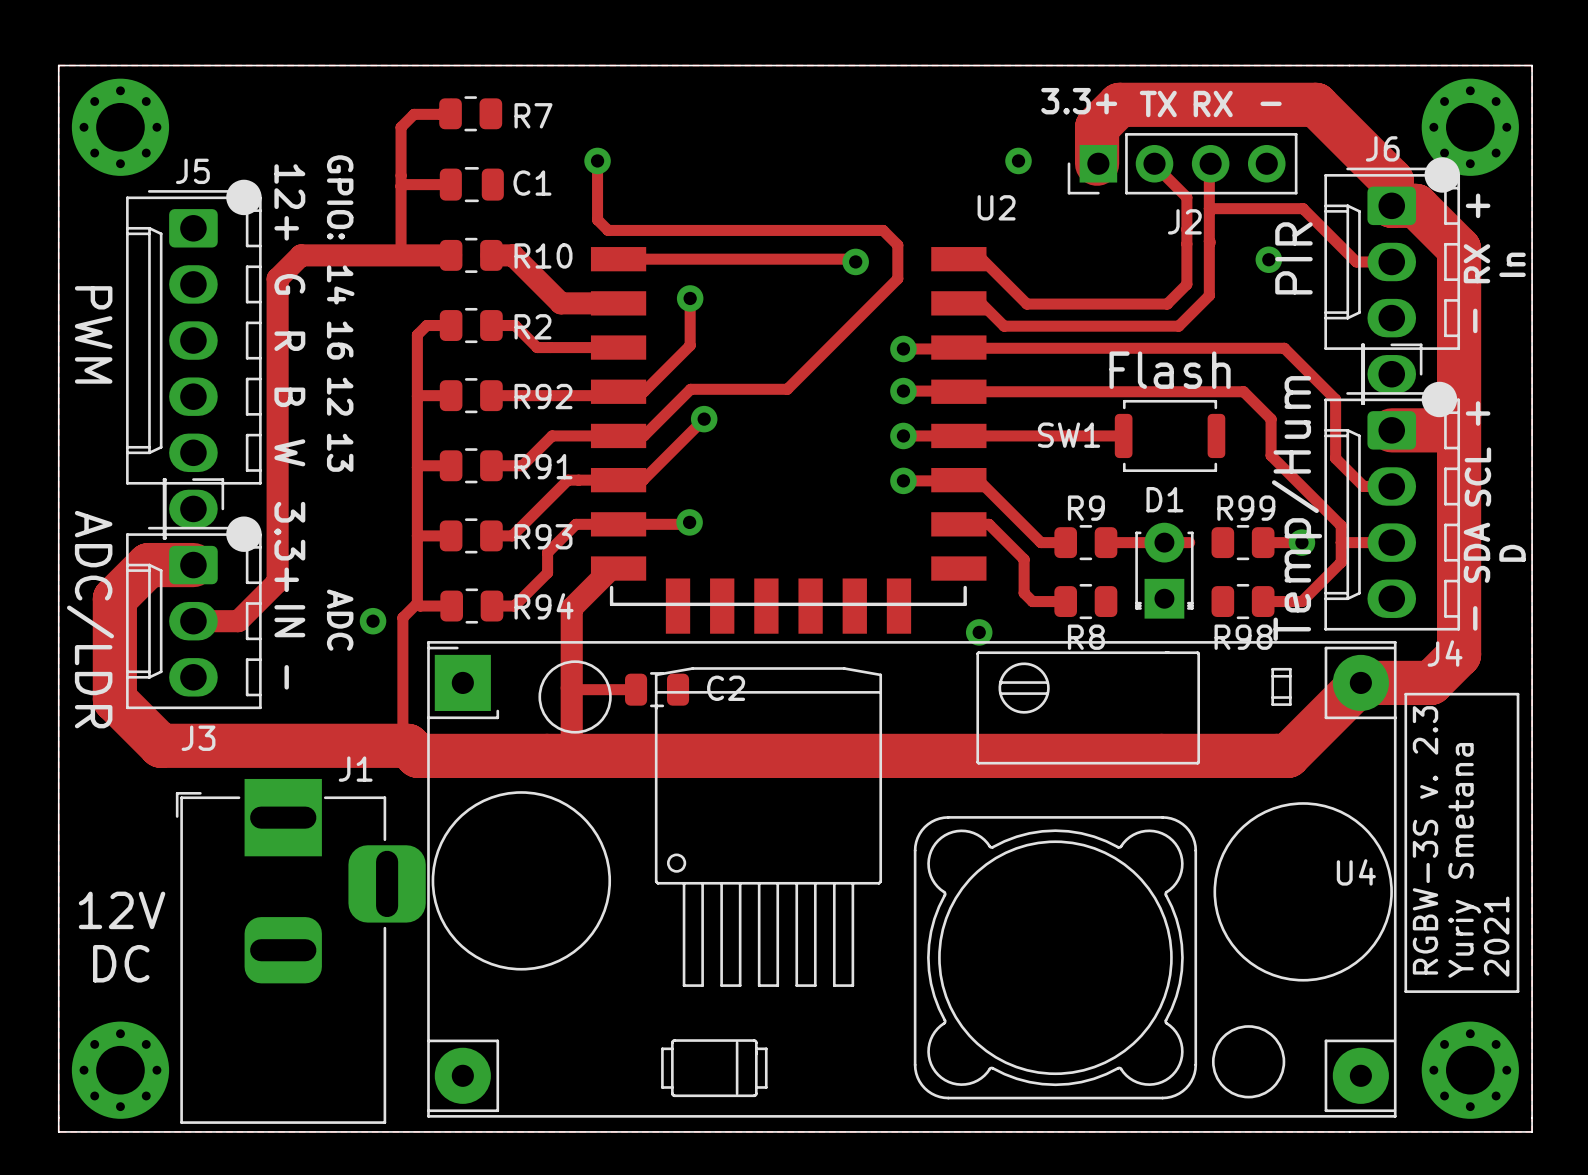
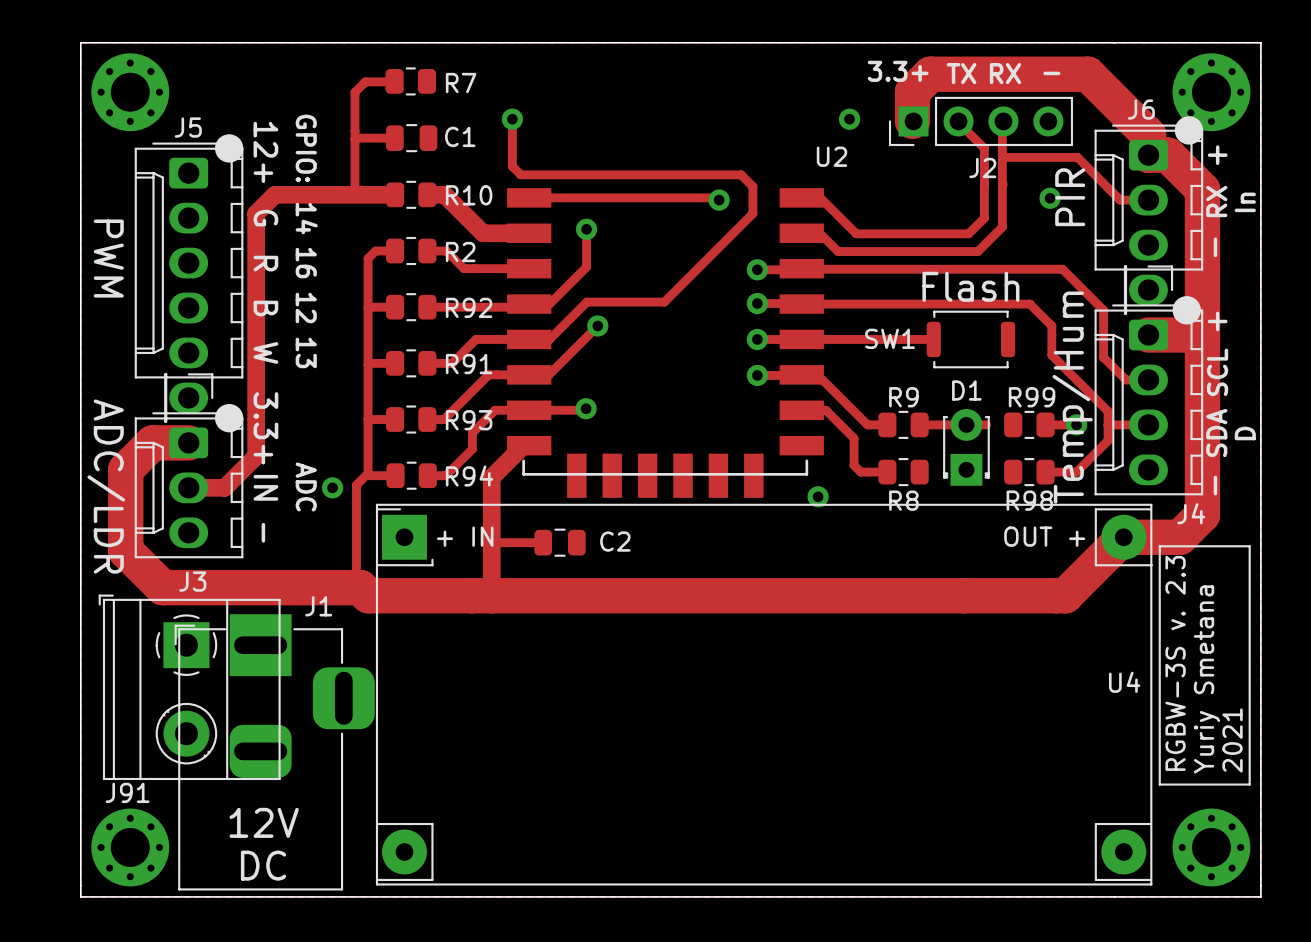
U4 footprint: [427, 641, 1398, 1118] -> [375, 503, 1153, 886]
J91: none -> (189, 687)
text position: 12V (122, 910) -> 12V (264, 822)
text position: DC (121, 963) -> DC (263, 865)

